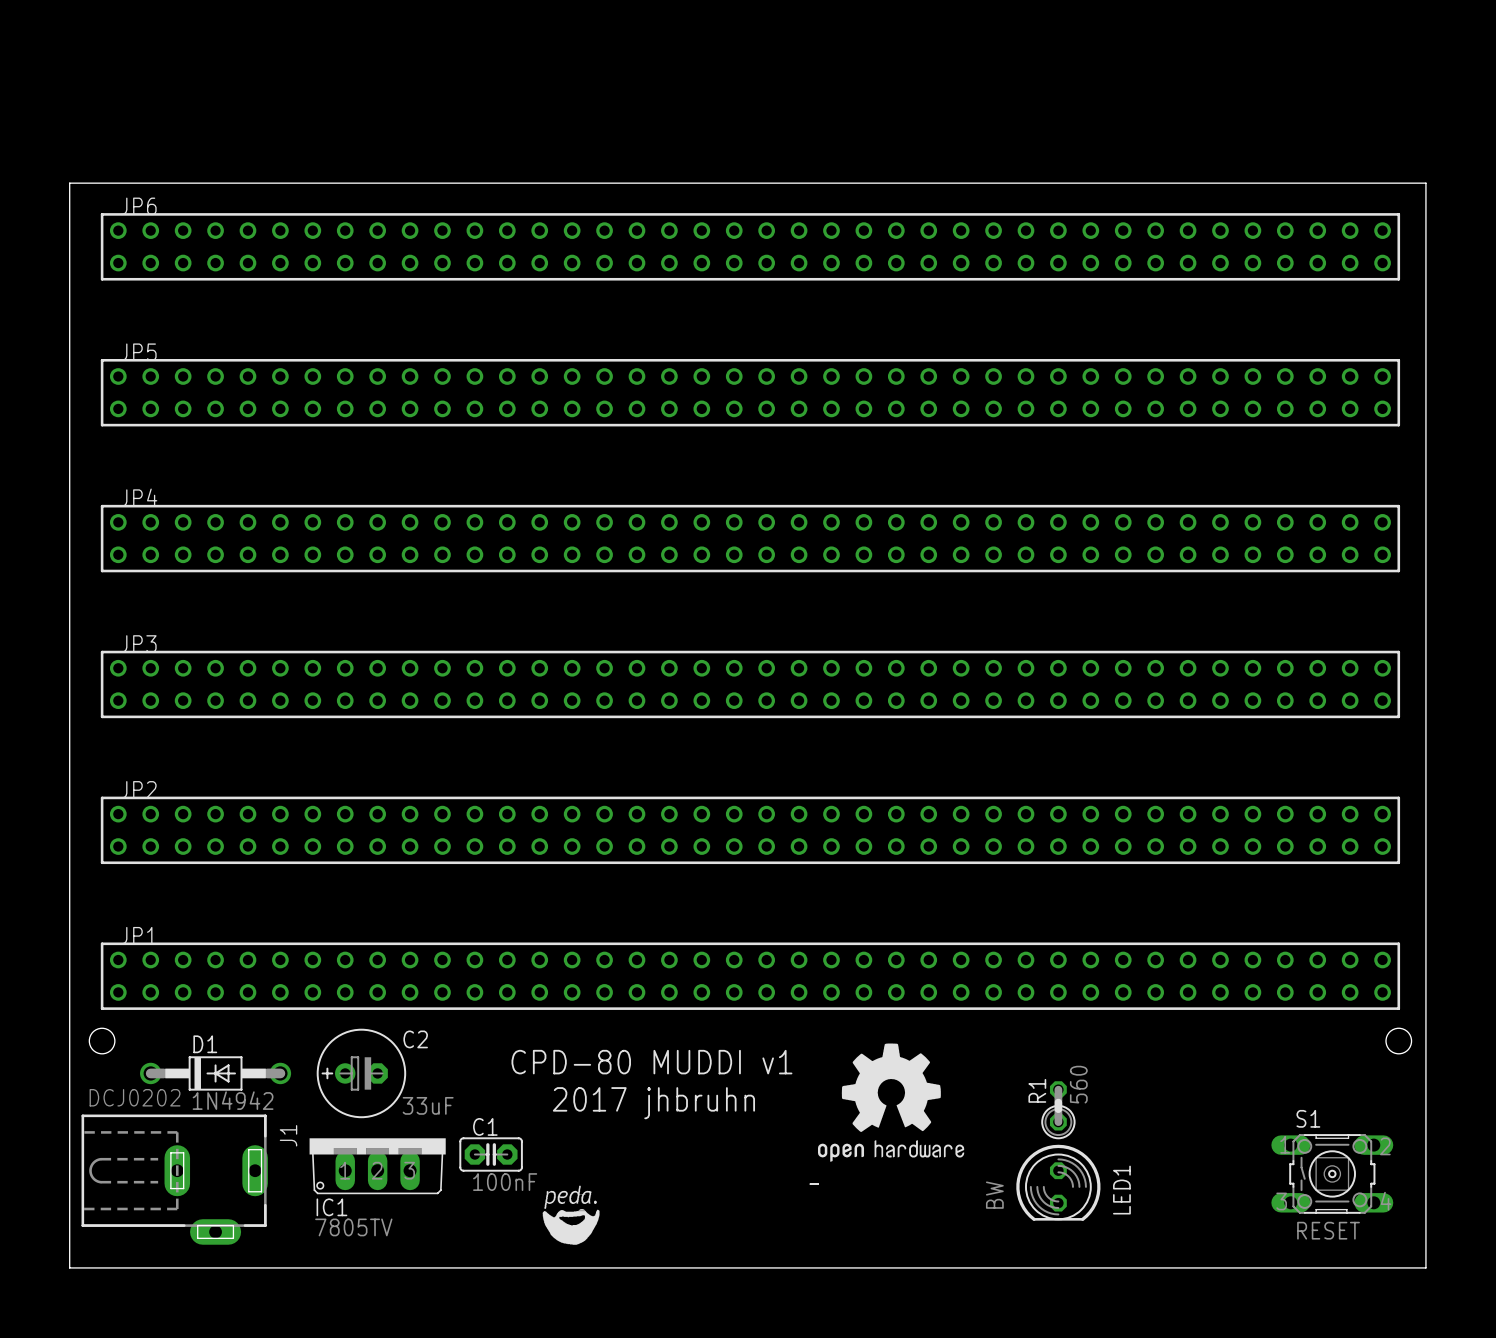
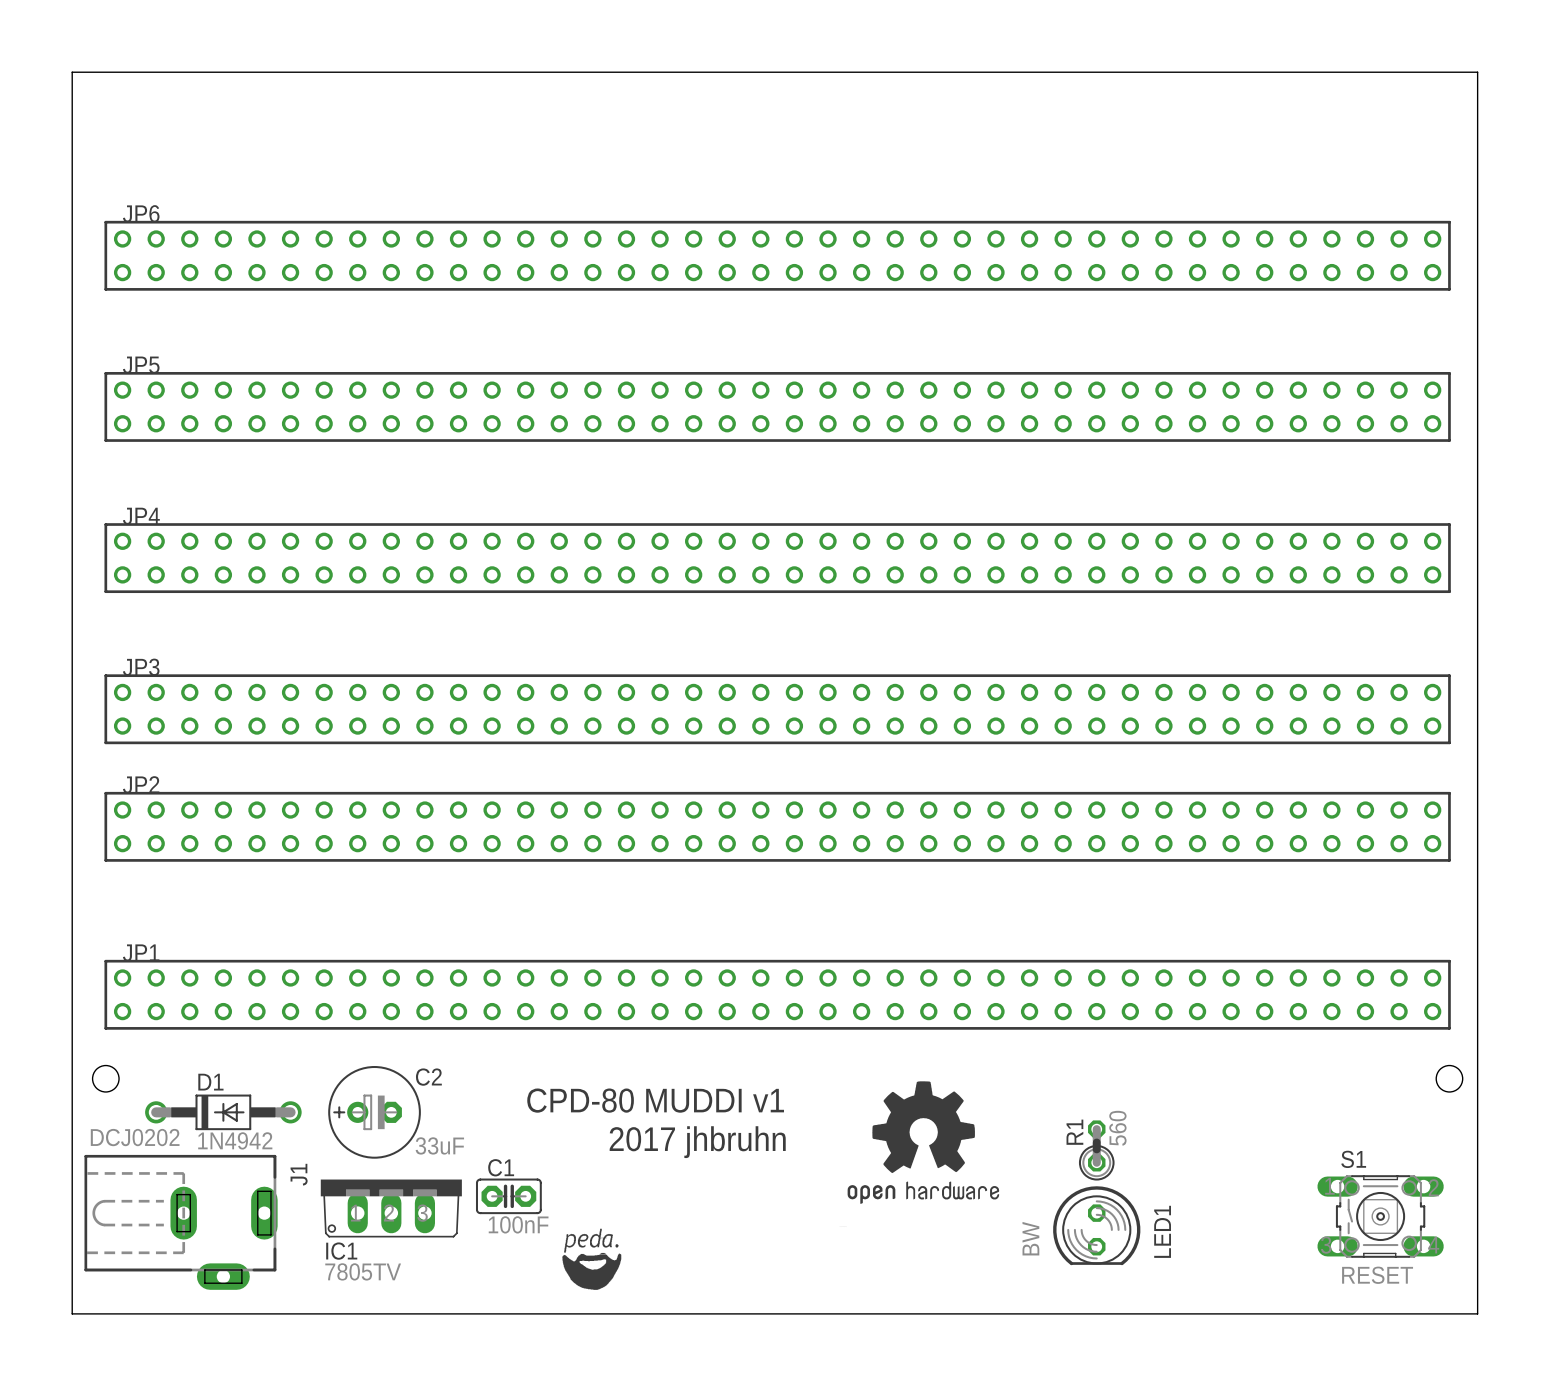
board edge: (69, 183) (1425, 183) -> (72, 189) (72, 72) (1477, 72) (1477, 189)
JP2 position: (750, 830) -> (777, 826)
JP1 position: (750, 976) -> (777, 994)

